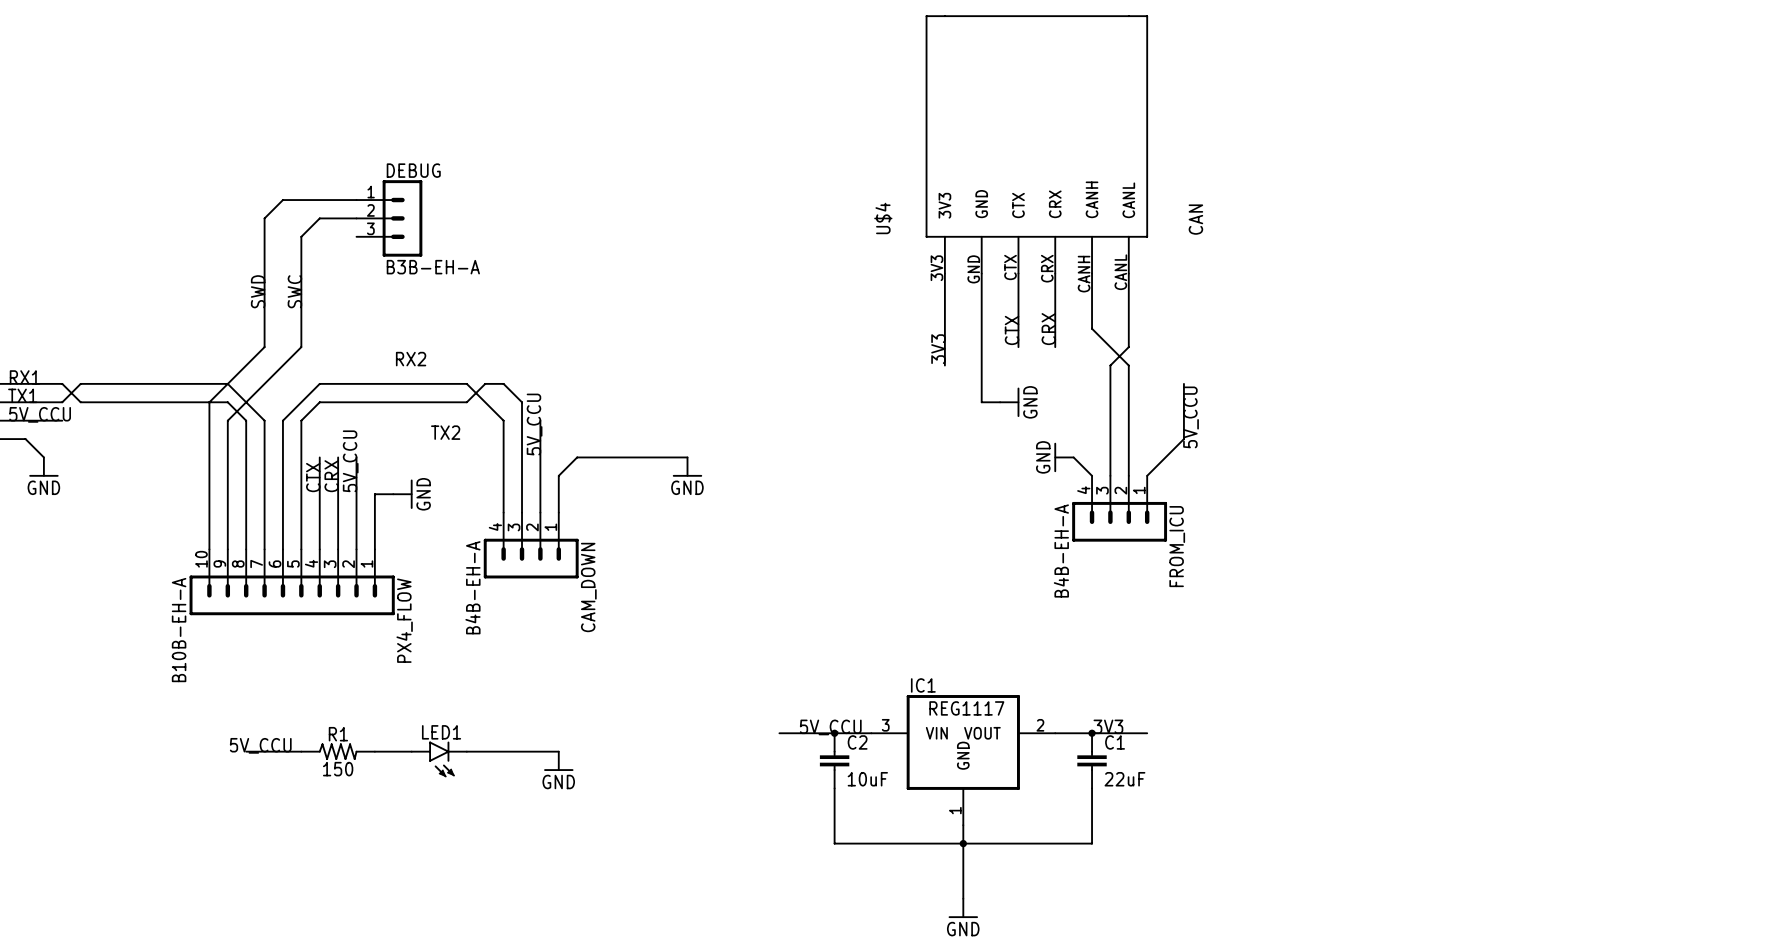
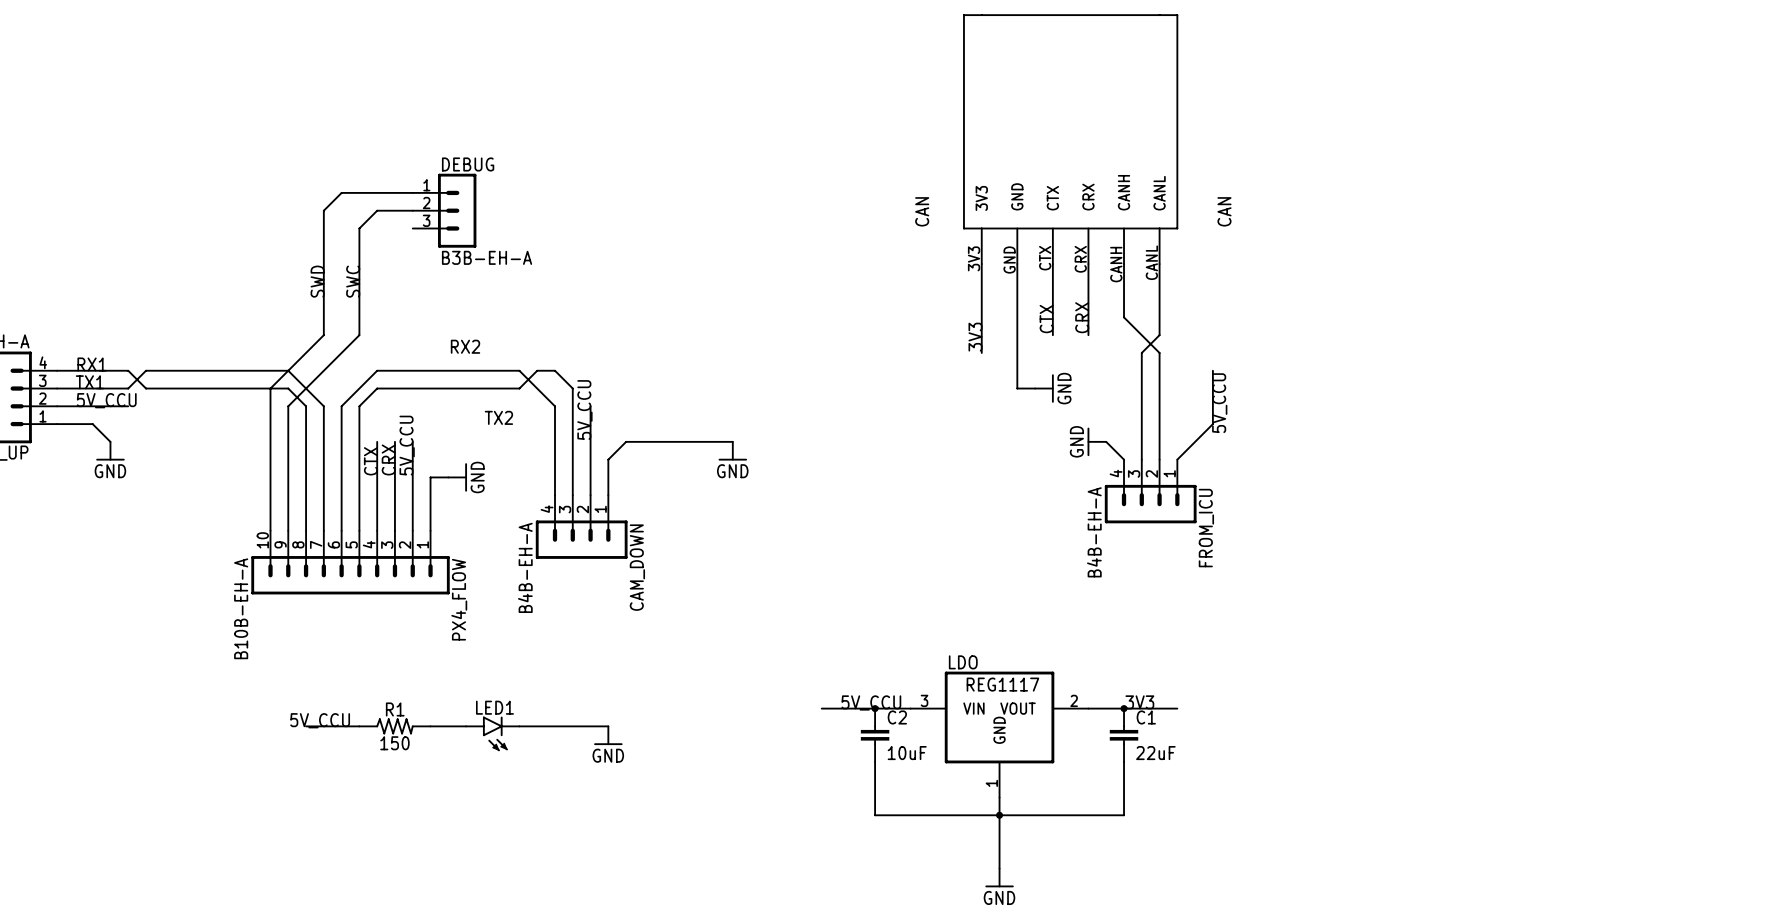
U$4 name: U$4 (883, 218) -> CAN (922, 211)
IC1 name: IC1 (923, 685) -> LDO (963, 662)

